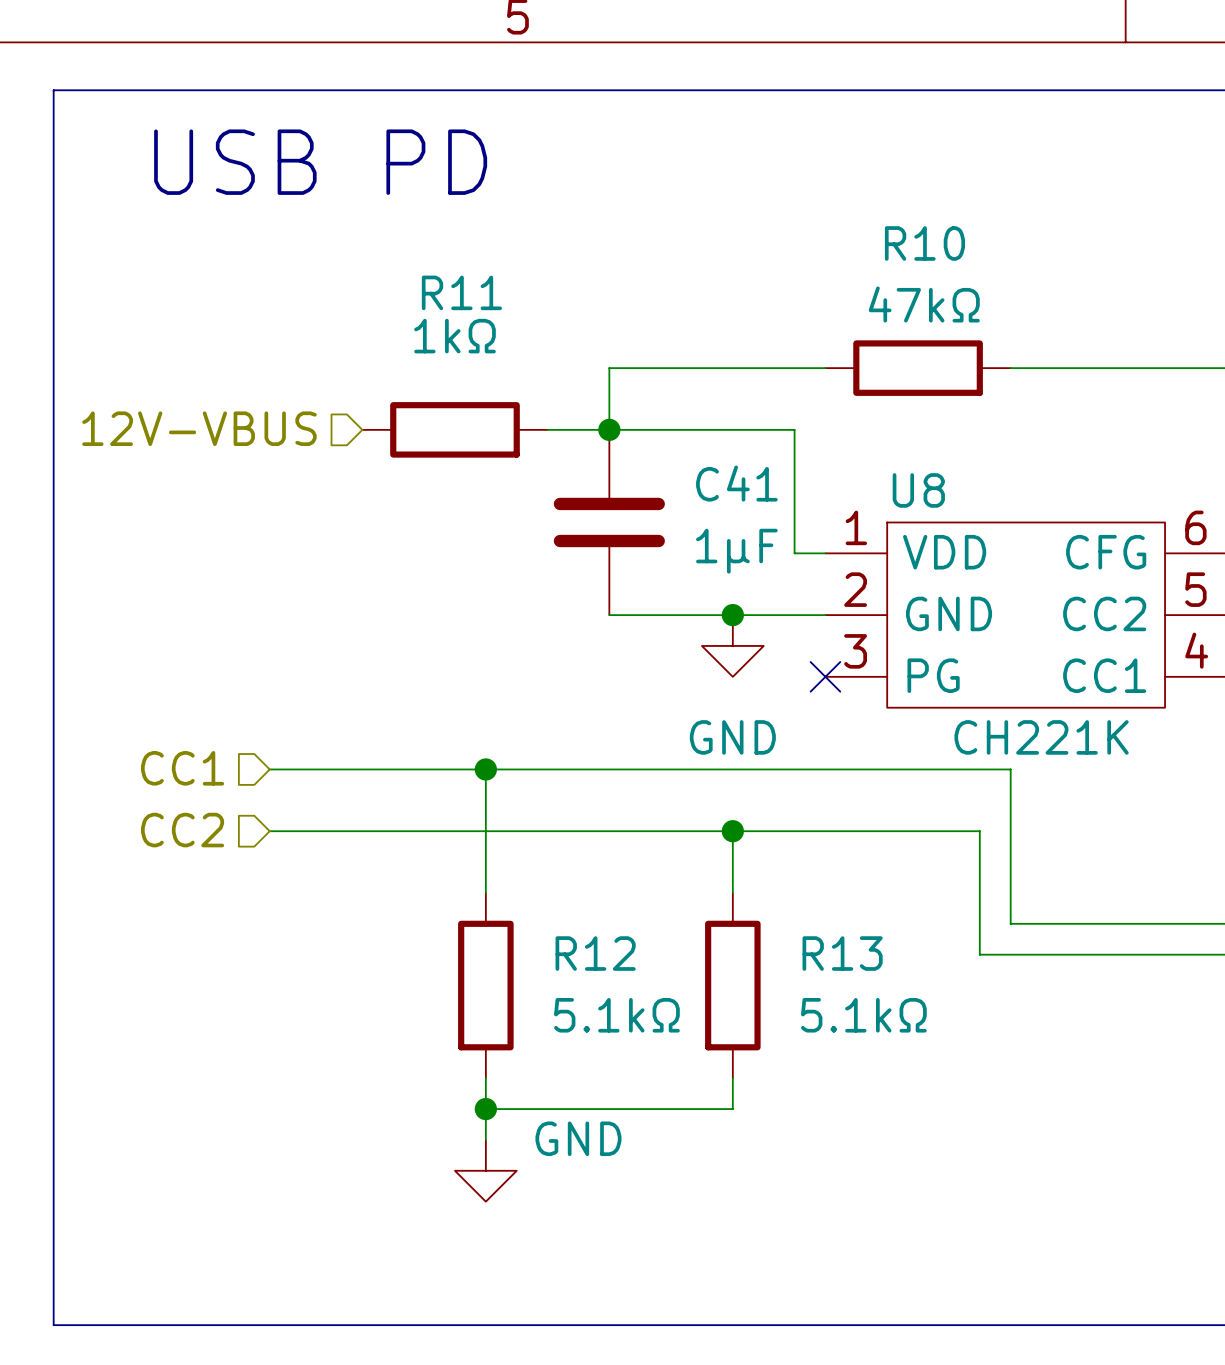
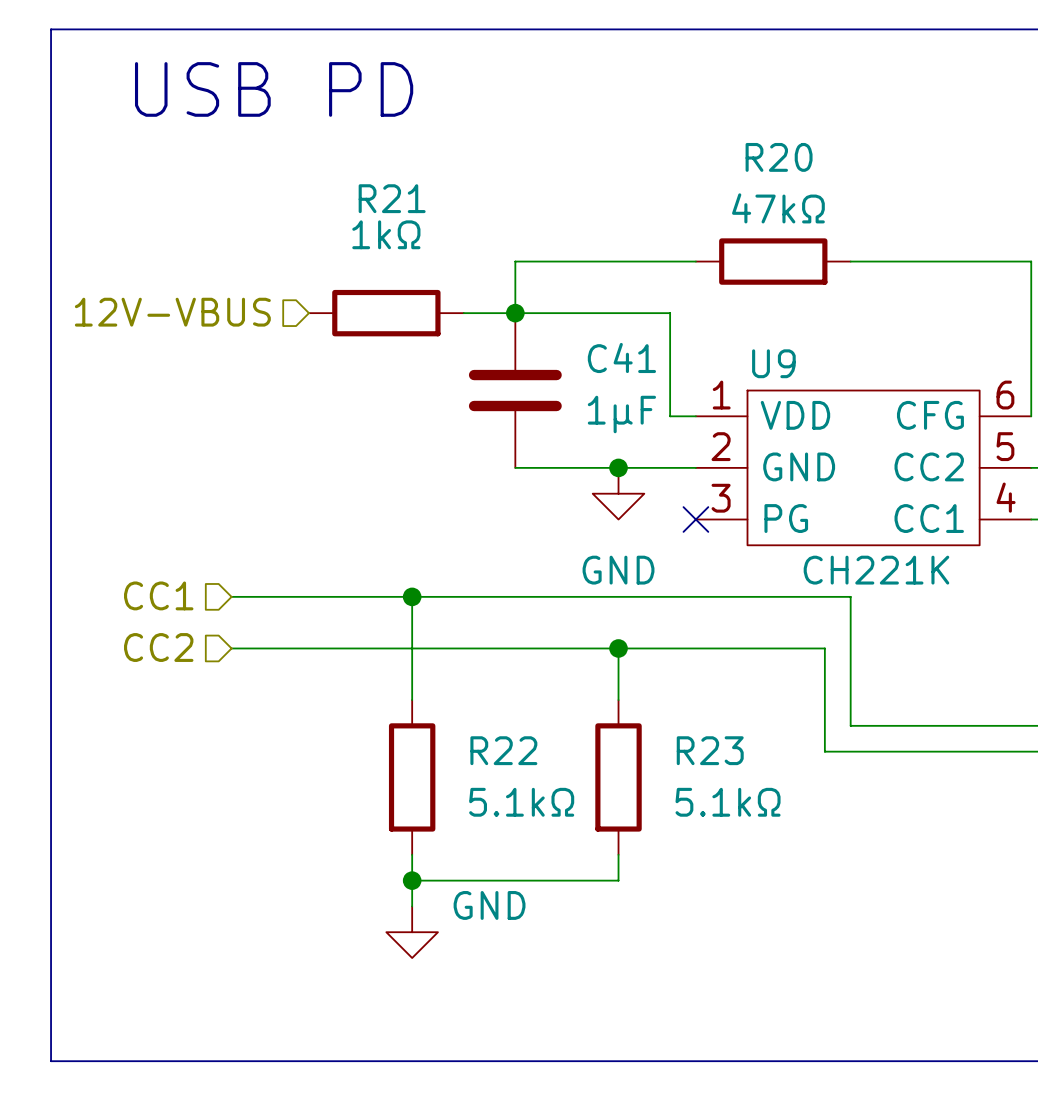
R10 name: R10 (924, 243) -> R20 (779, 157)
R11 name: R11 (461, 292) -> R21 (392, 198)
U8 name: U8 (918, 490) -> U9 (773, 363)
R12 name: R12 (595, 953) -> R22 (503, 750)
R13 name: R13 (842, 953) -> R23 (710, 750)

